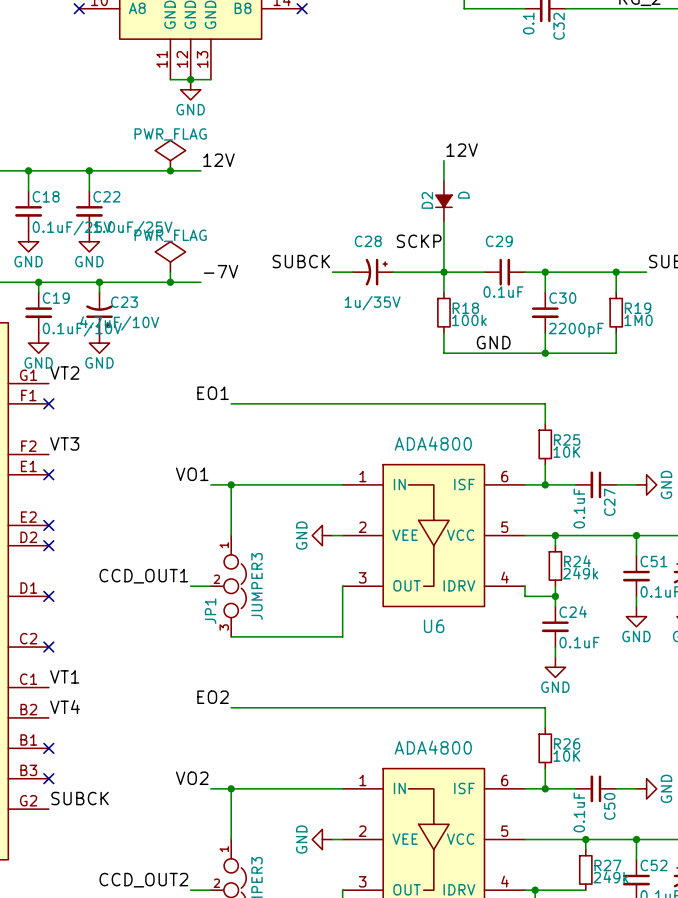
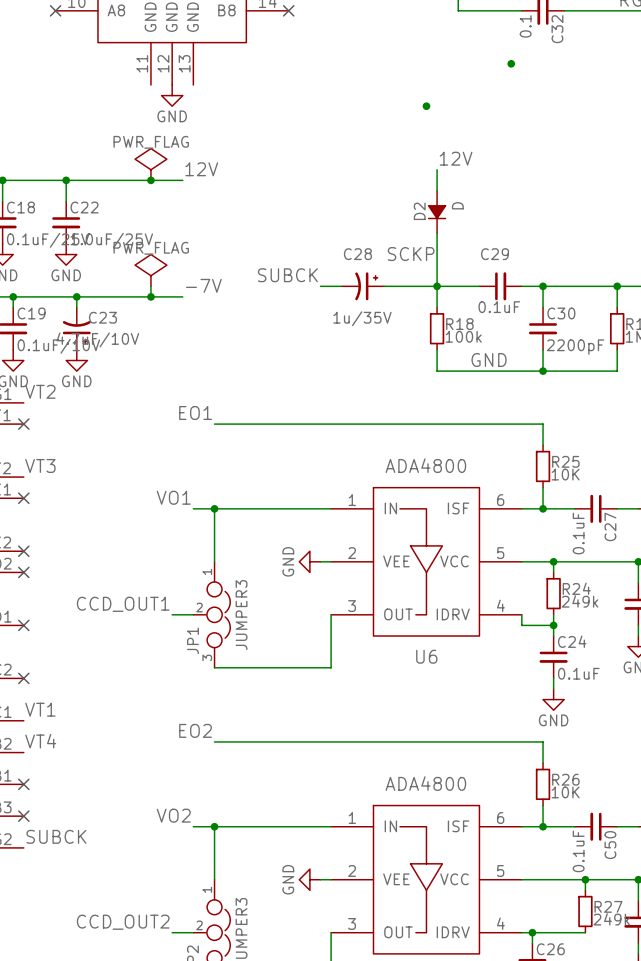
junction: none -> (511, 63)
wire: (170, 79) (210, 79) -> none
junction: (190, 79) -> none
junction: none -> (426, 106)

